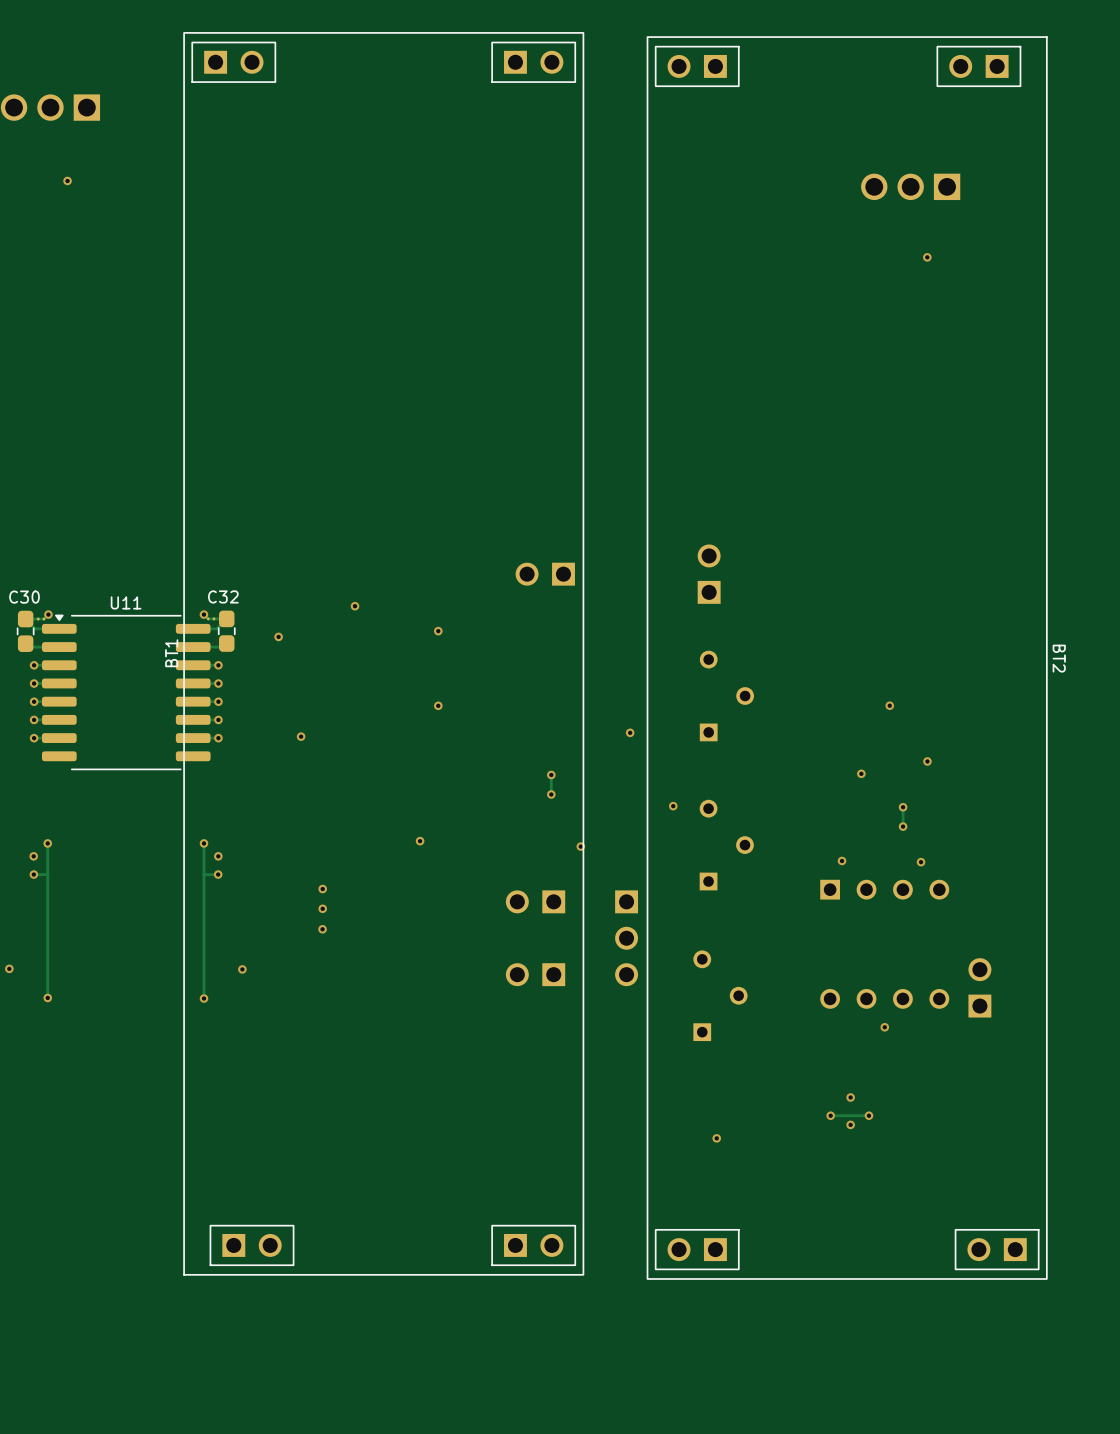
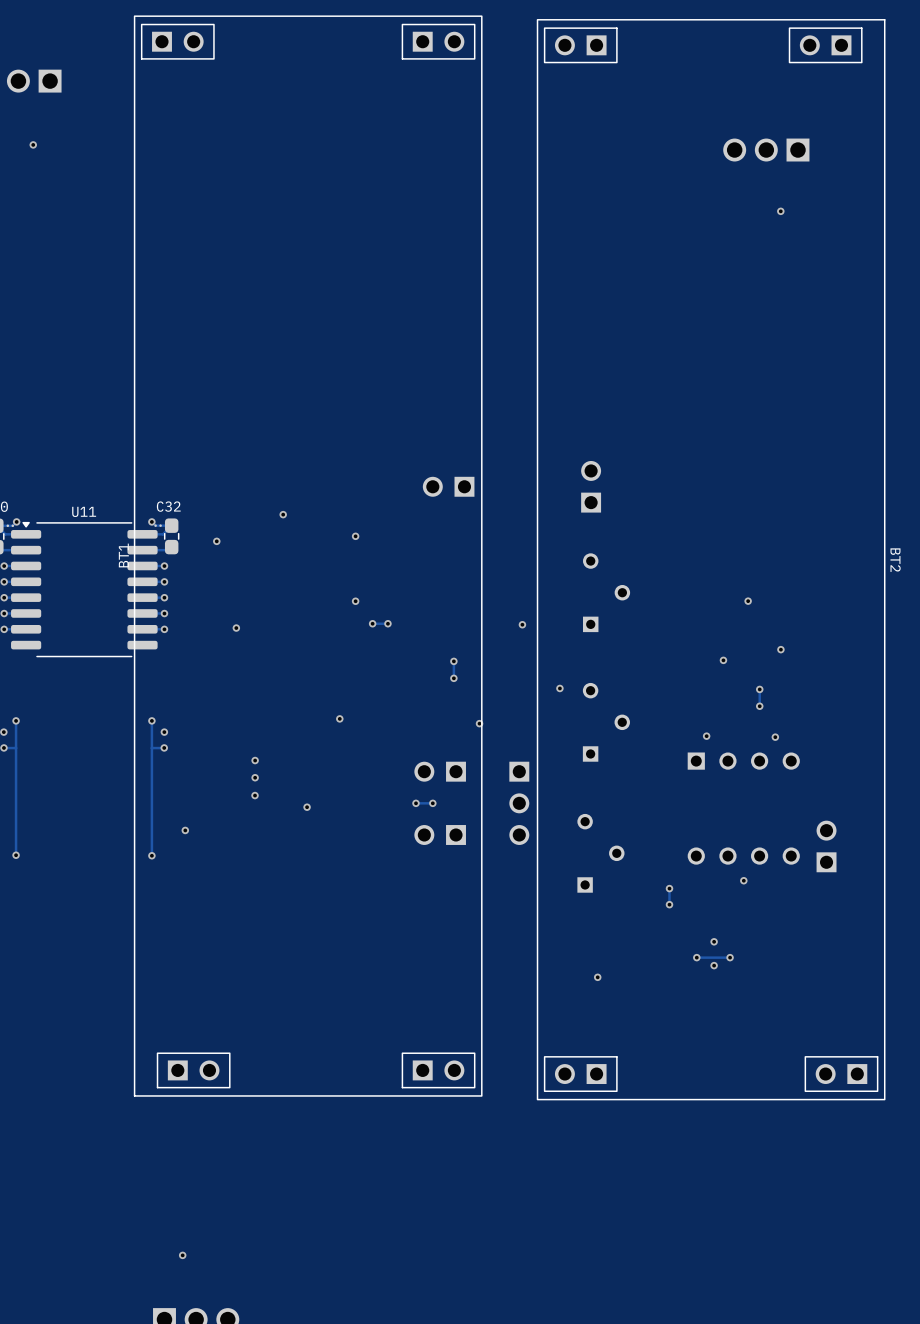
via: none -> (372, 623)
track: none -> (387, 623) (372, 623)
via: none -> (387, 623)
via: none -> (415, 803)
track: none -> (432, 803) (415, 803)
via: none -> (432, 803)
via: none -> (307, 807)
track: none -> (669, 888) (669, 904)
via: none -> (669, 888)
via: none -> (669, 904)

